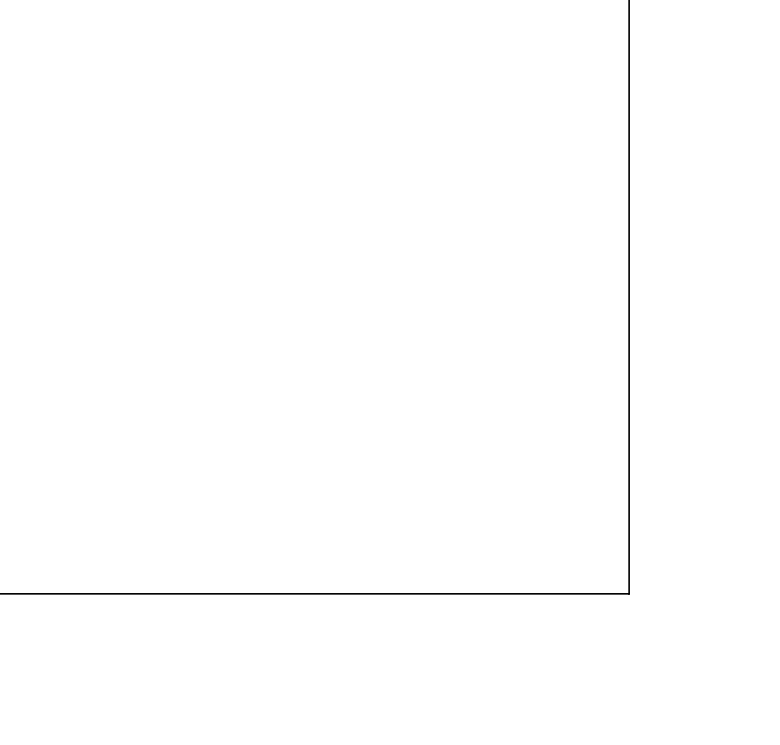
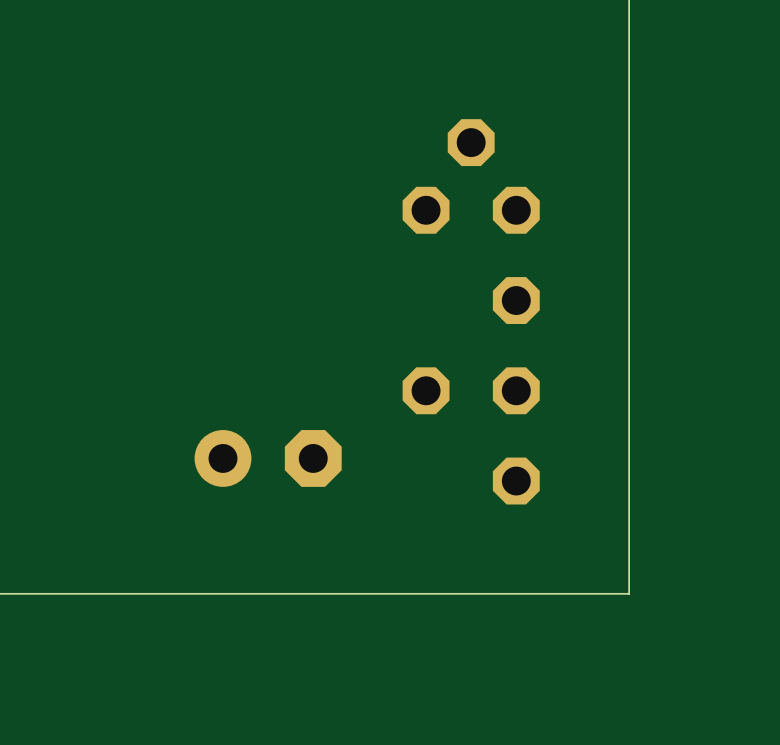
part: none -> (471, 176)
part: none -> (471, 390)
part: none -> (268, 458)

